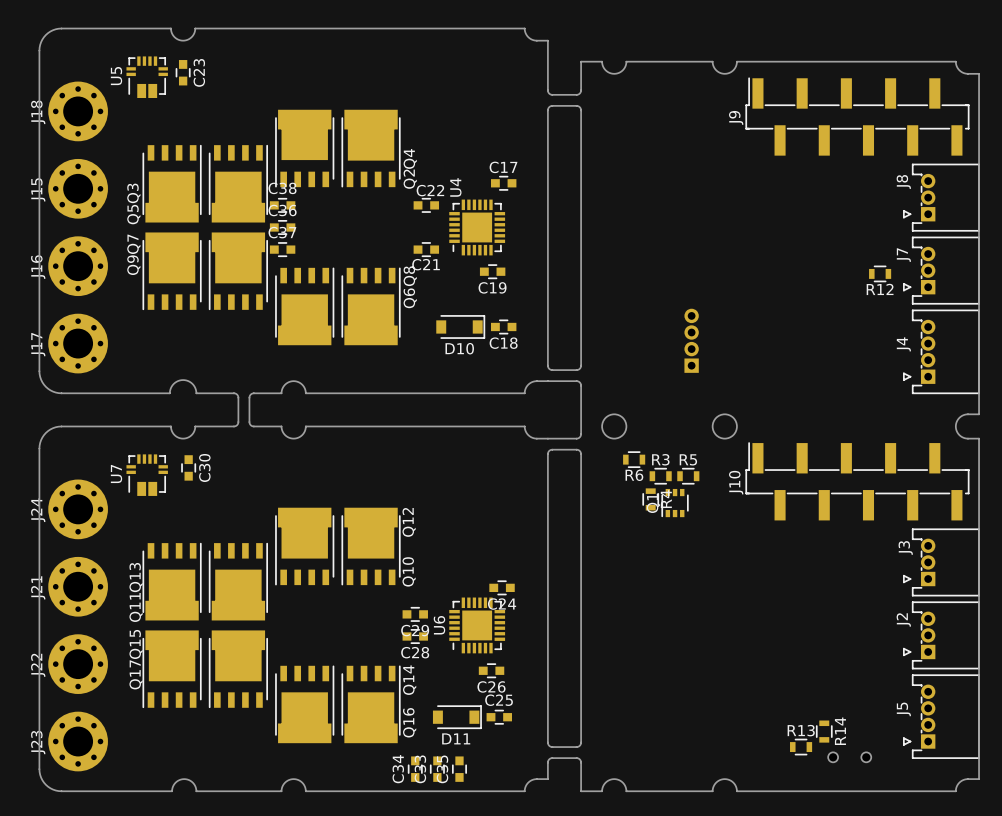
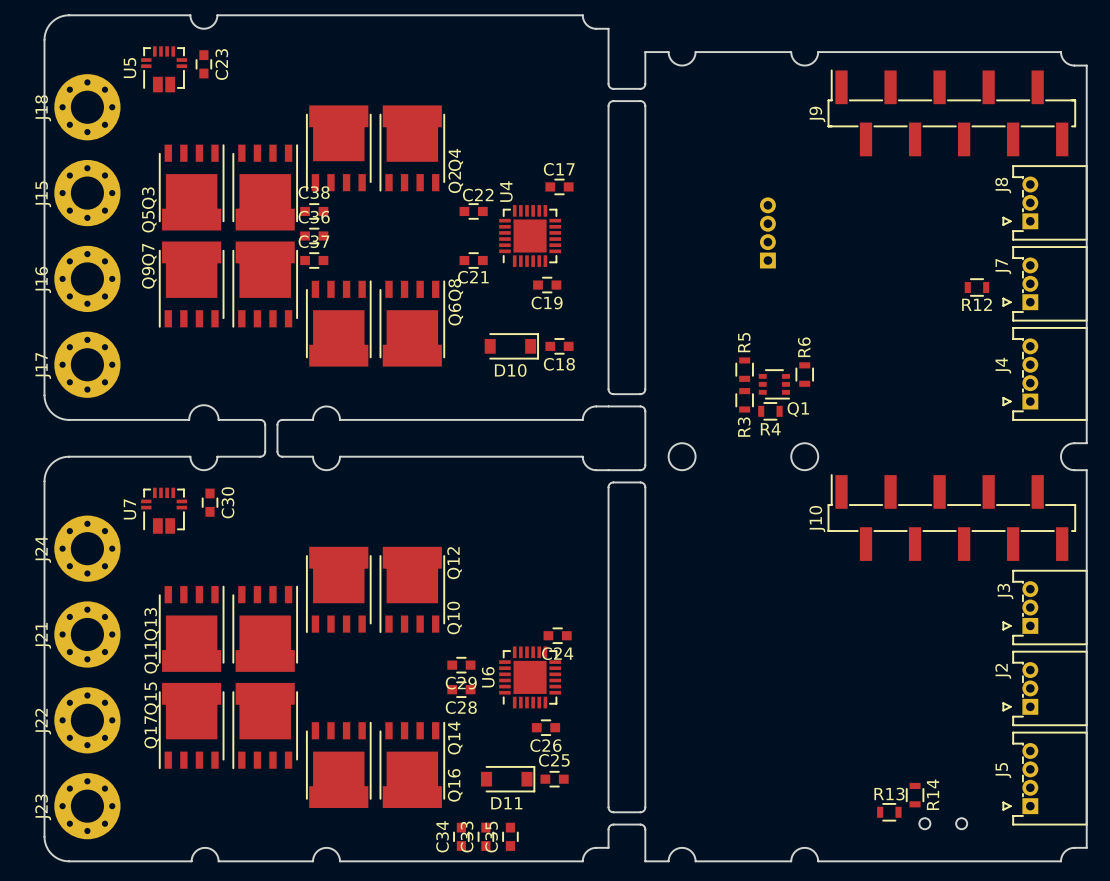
part position: (691, 340) -> (767, 232)
R6 rotation: 0° (634, 459) -> 90° clockwise (804, 374)
R6 position: (634, 459) -> (804, 374)
R3 name position: R3 (660, 459) -> R3 (744, 427)
R6 name position: R6 (634, 475) -> R6 (804, 347)
R3 rotation: 0° (660, 476) -> 90° clockwise (744, 400)
R3 position: (660, 476) -> (744, 400)
R5 rotation: 0° (688, 476) -> 90° clockwise (744, 369)
R5 position: (688, 476) -> (744, 369)
R4 rotation: 0° (650, 499) -> 90° clockwise (770, 411)
R4 position: (650, 499) -> (770, 411)
Q1 rotation: 0° (675, 503) -> 90° counterclockwise (774, 384)
Q1 position: (675, 503) -> (774, 384)

